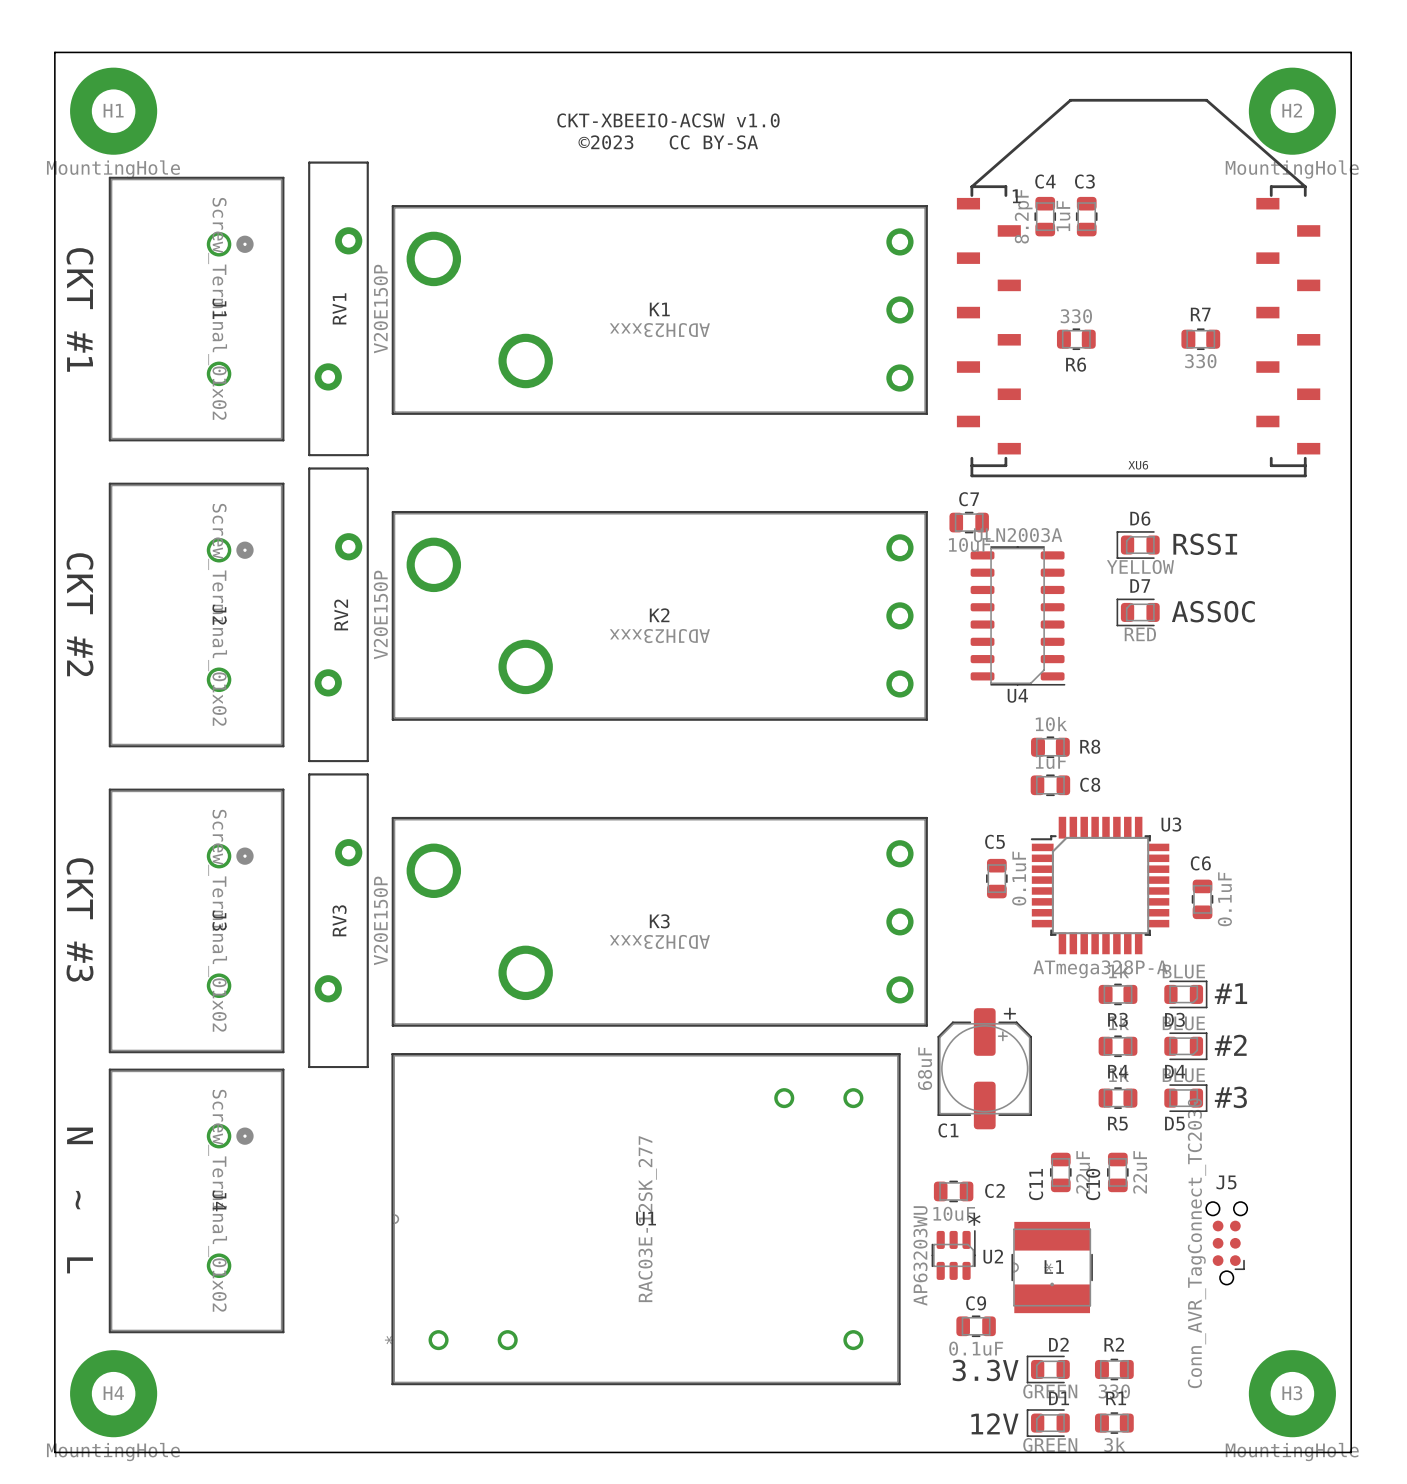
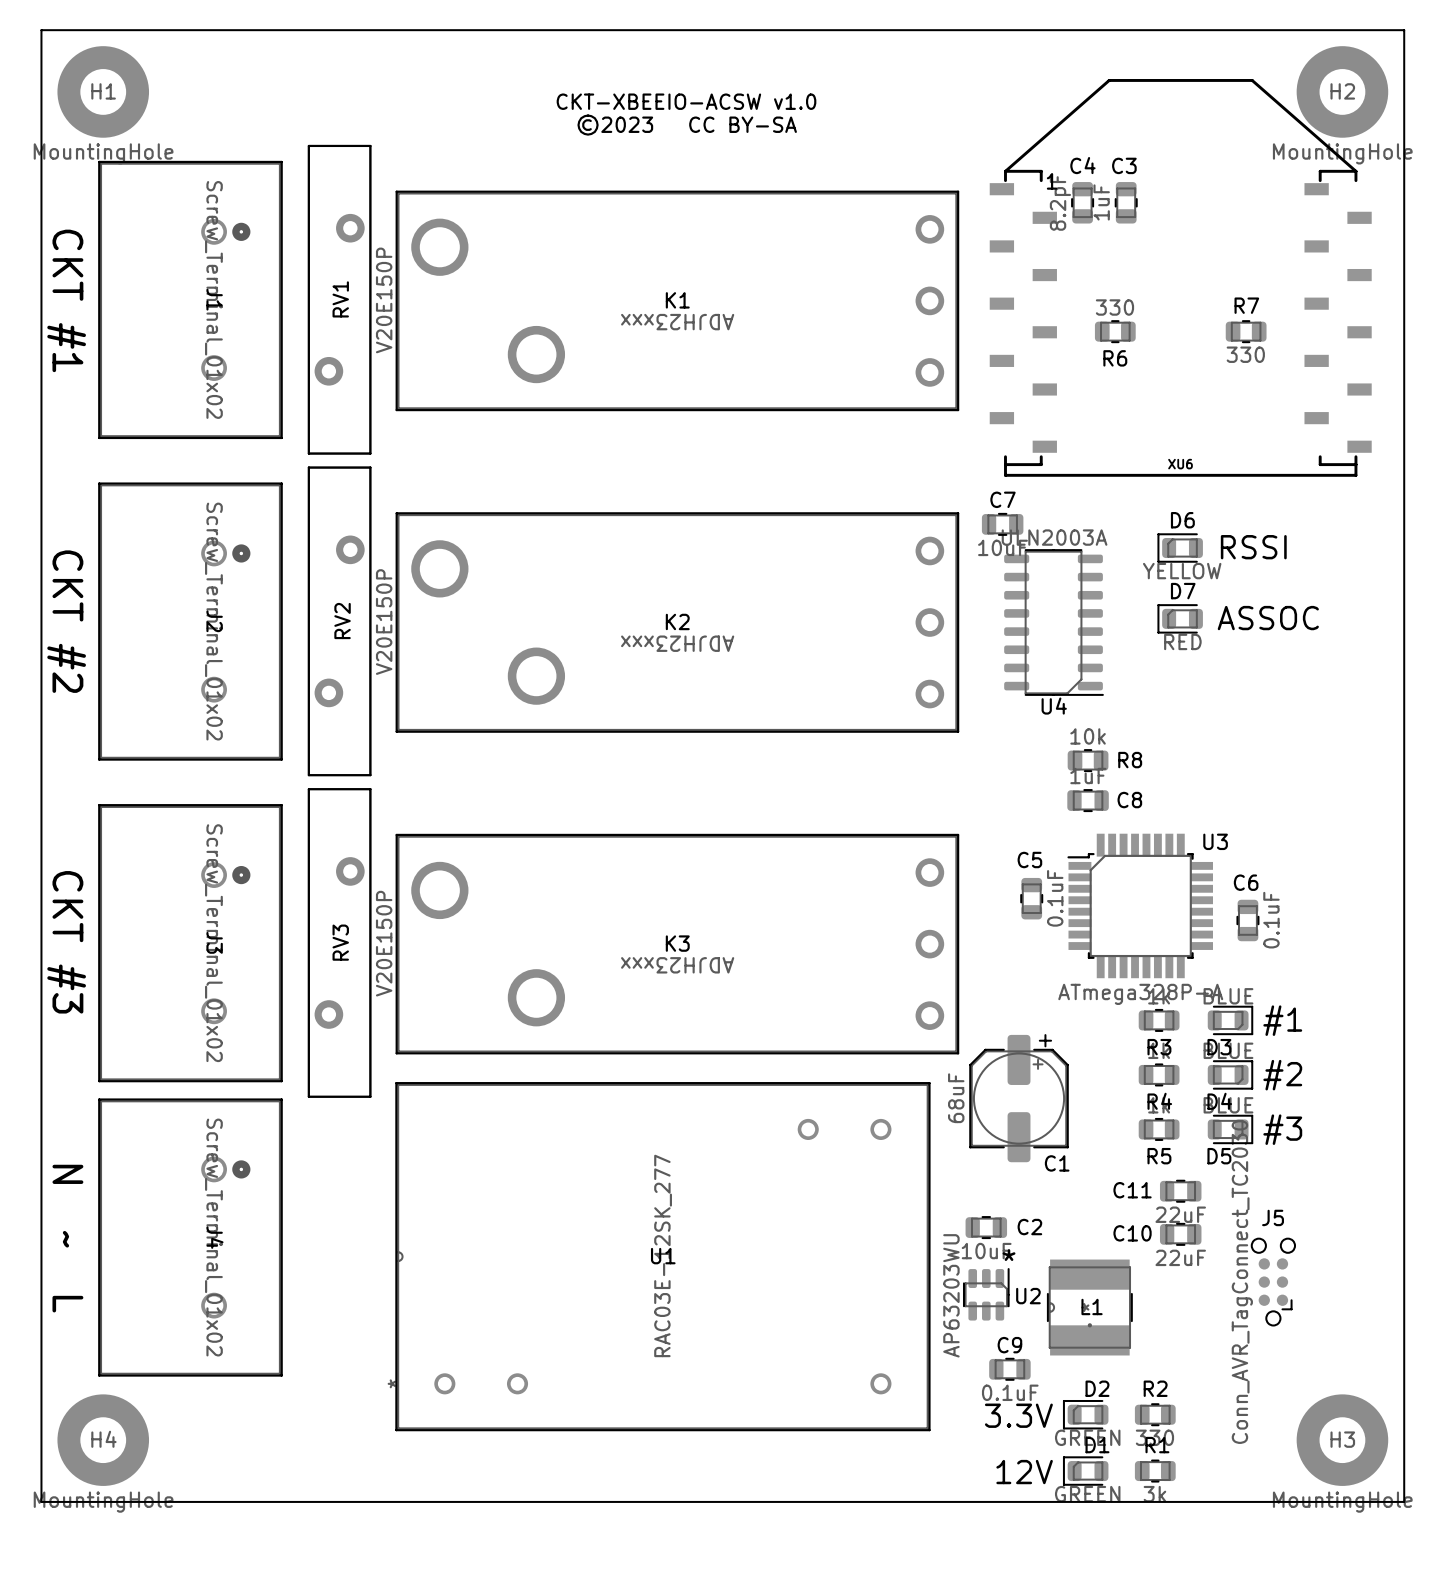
C1 name position: C1 (948, 1130) -> C1 (1057, 1163)
C11 rotation: 0° (1060, 1172) -> 90° clockwise (1180, 1191)
C11 position: (1060, 1172) -> (1180, 1191)
C10 rotation: 0° (1117, 1172) -> 90° clockwise (1180, 1234)
C10 position: (1117, 1172) -> (1180, 1234)

